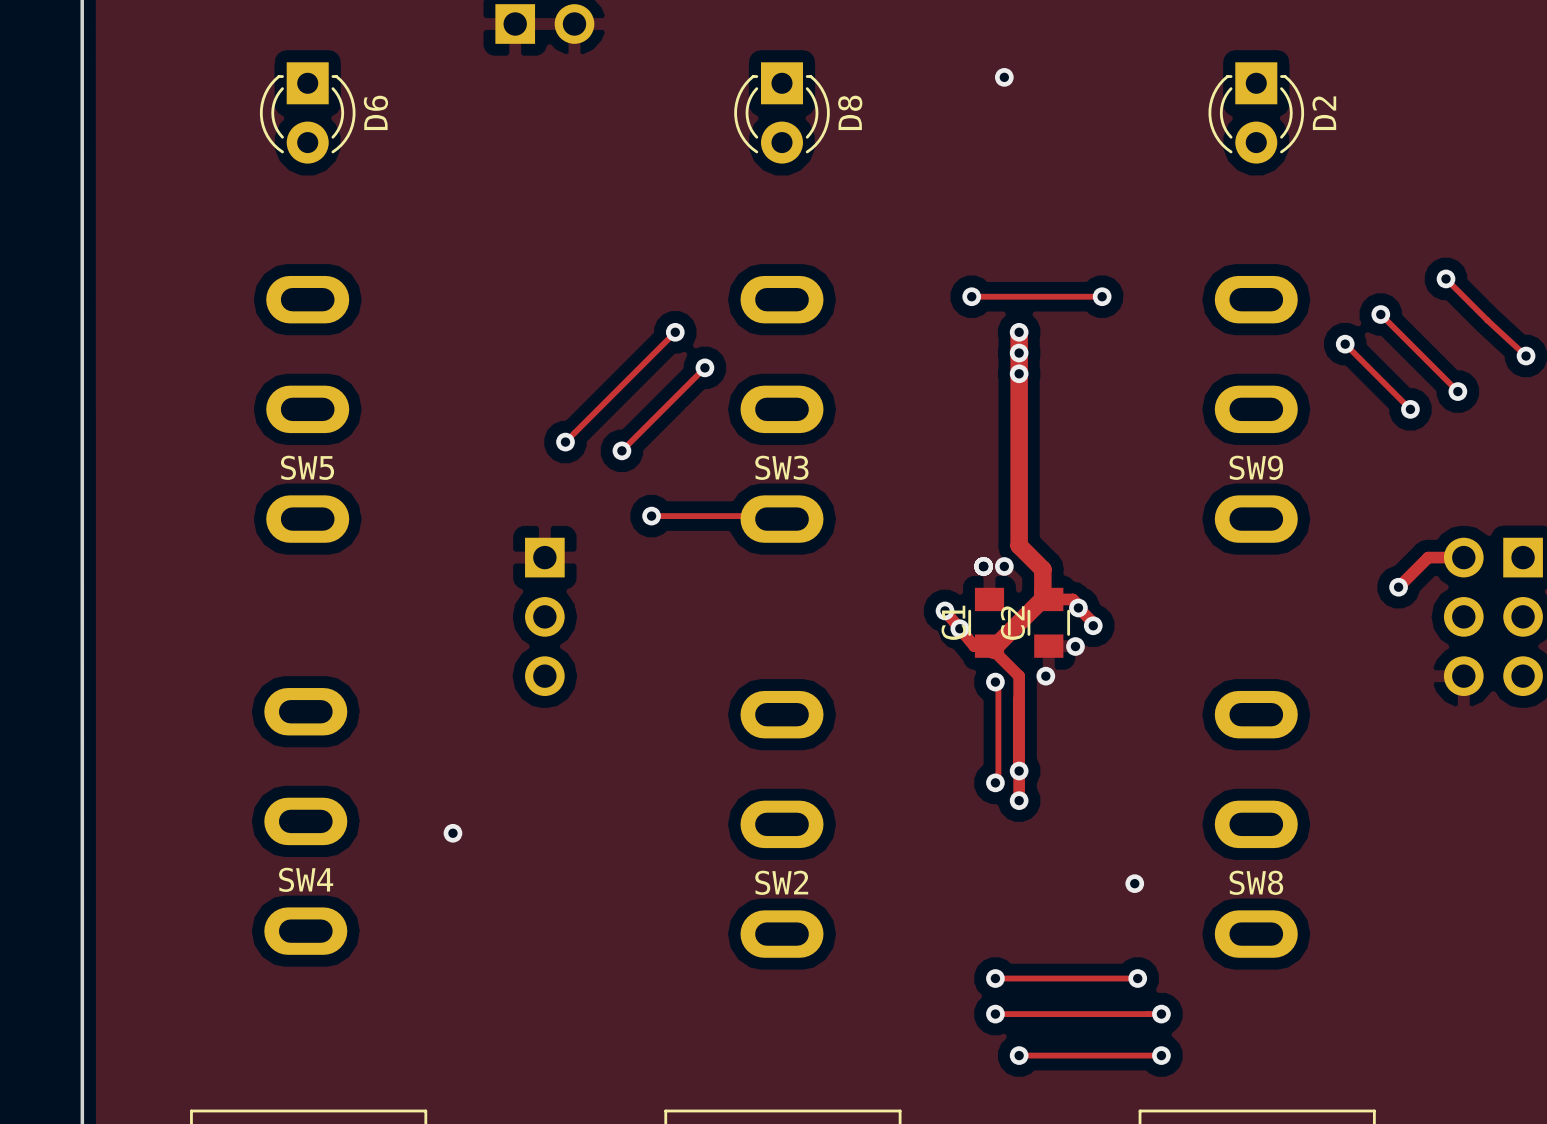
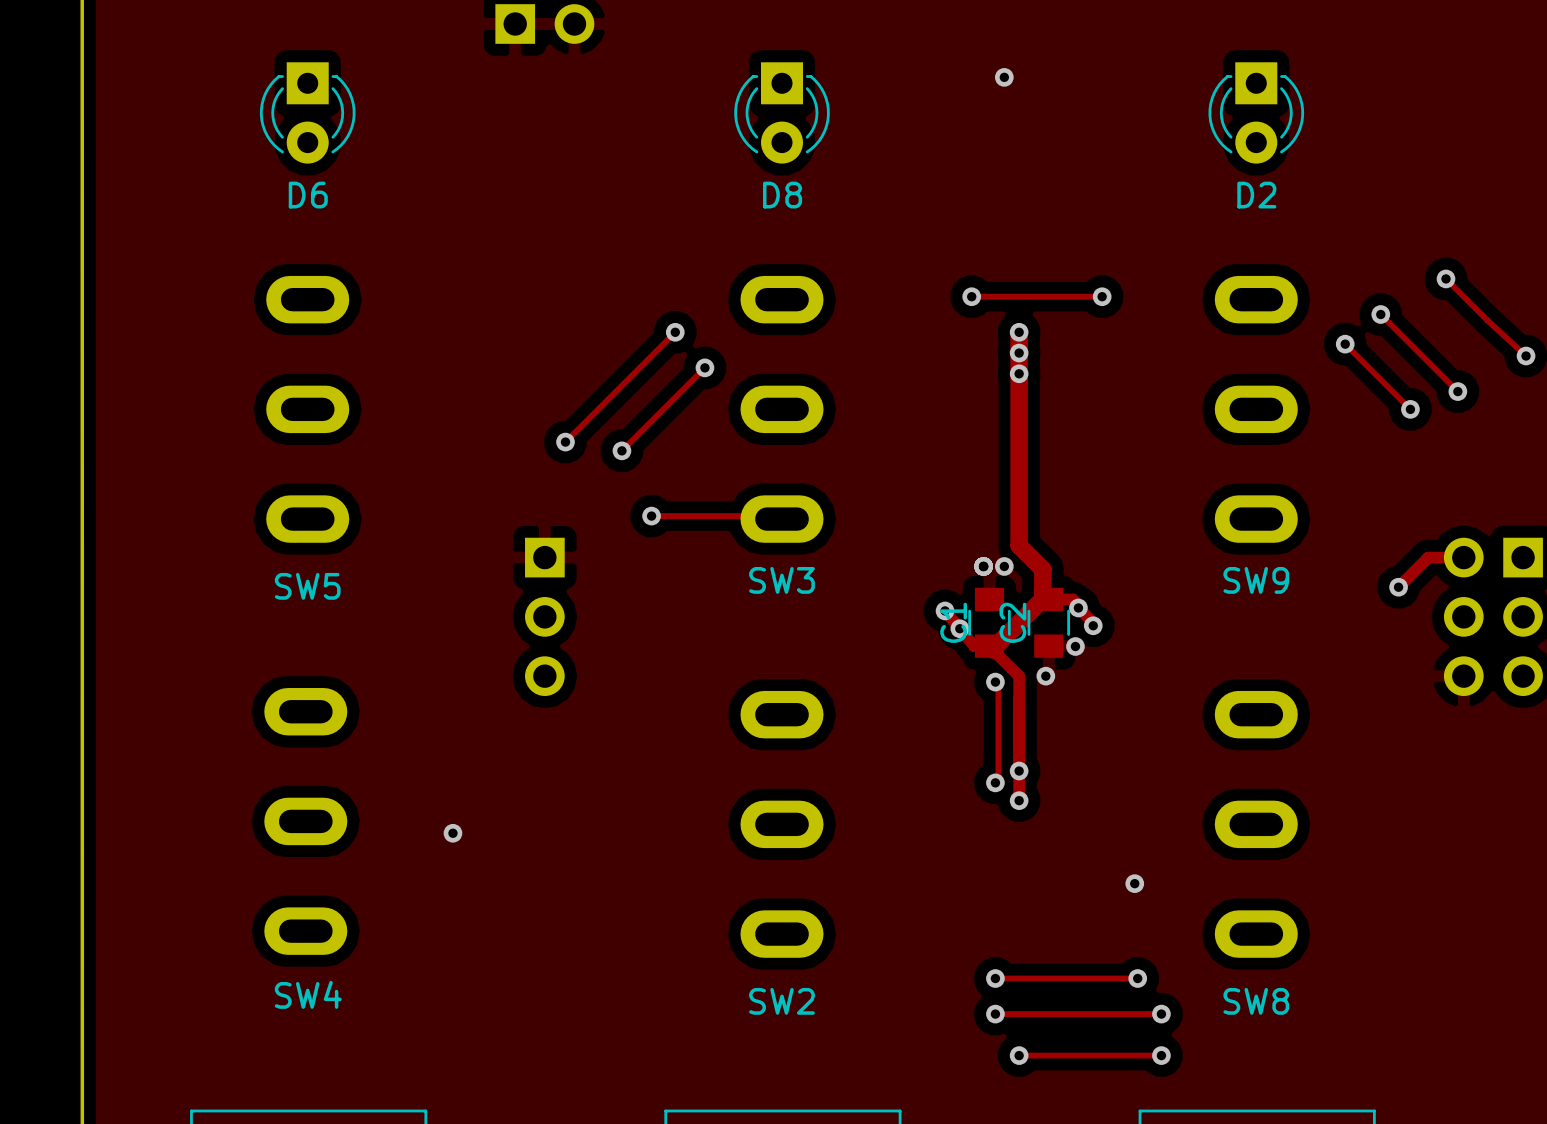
D6 name rotation: 0° (375, 112) -> 90° clockwise (308, 195)
D6 name position: D6 (375, 112) -> D6 (308, 195)
D8 name rotation: 0° (850, 112) -> 90° clockwise (782, 195)
D8 name position: D8 (850, 112) -> D8 (782, 195)
D2 name rotation: 0° (1324, 113) -> 90° clockwise (1256, 195)
D2 name position: D2 (1324, 113) -> D2 (1256, 195)
SW5 name position: SW5 (307, 467) -> SW5 (307, 586)
SW3 name position: SW3 (781, 467) -> SW3 (782, 580)
SW9 name position: SW9 (1256, 467) -> SW9 (1256, 580)
SW4 name position: SW4 (306, 879) -> SW4 (308, 994)
SW2 name position: SW2 (781, 882) -> SW2 (782, 1001)
SW8 name position: SW8 (1256, 882) -> SW8 (1256, 1001)

